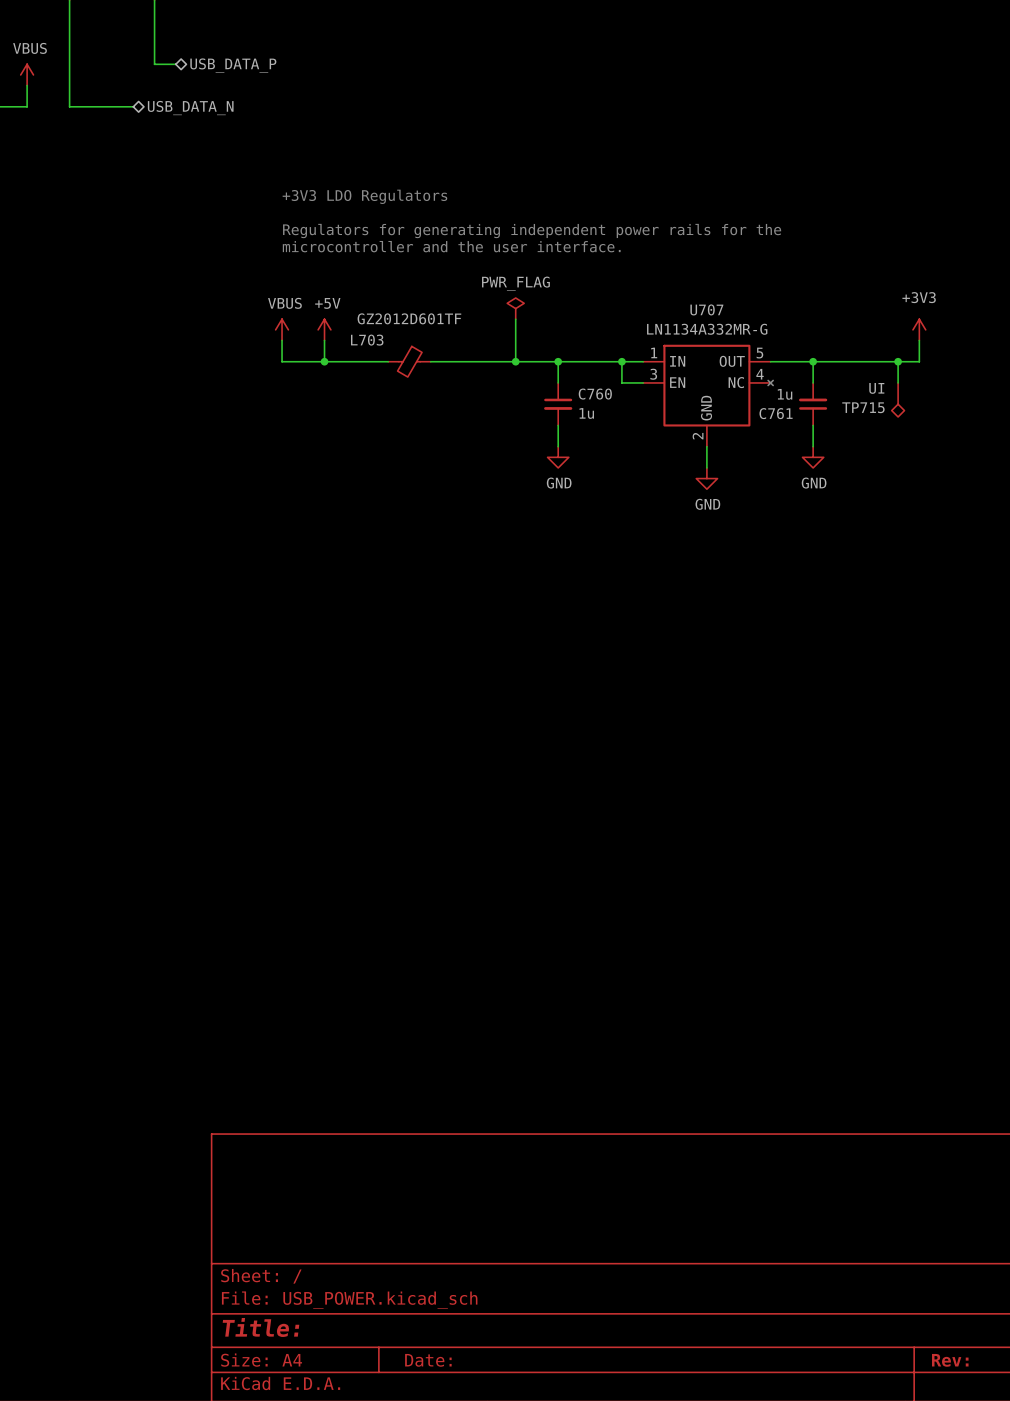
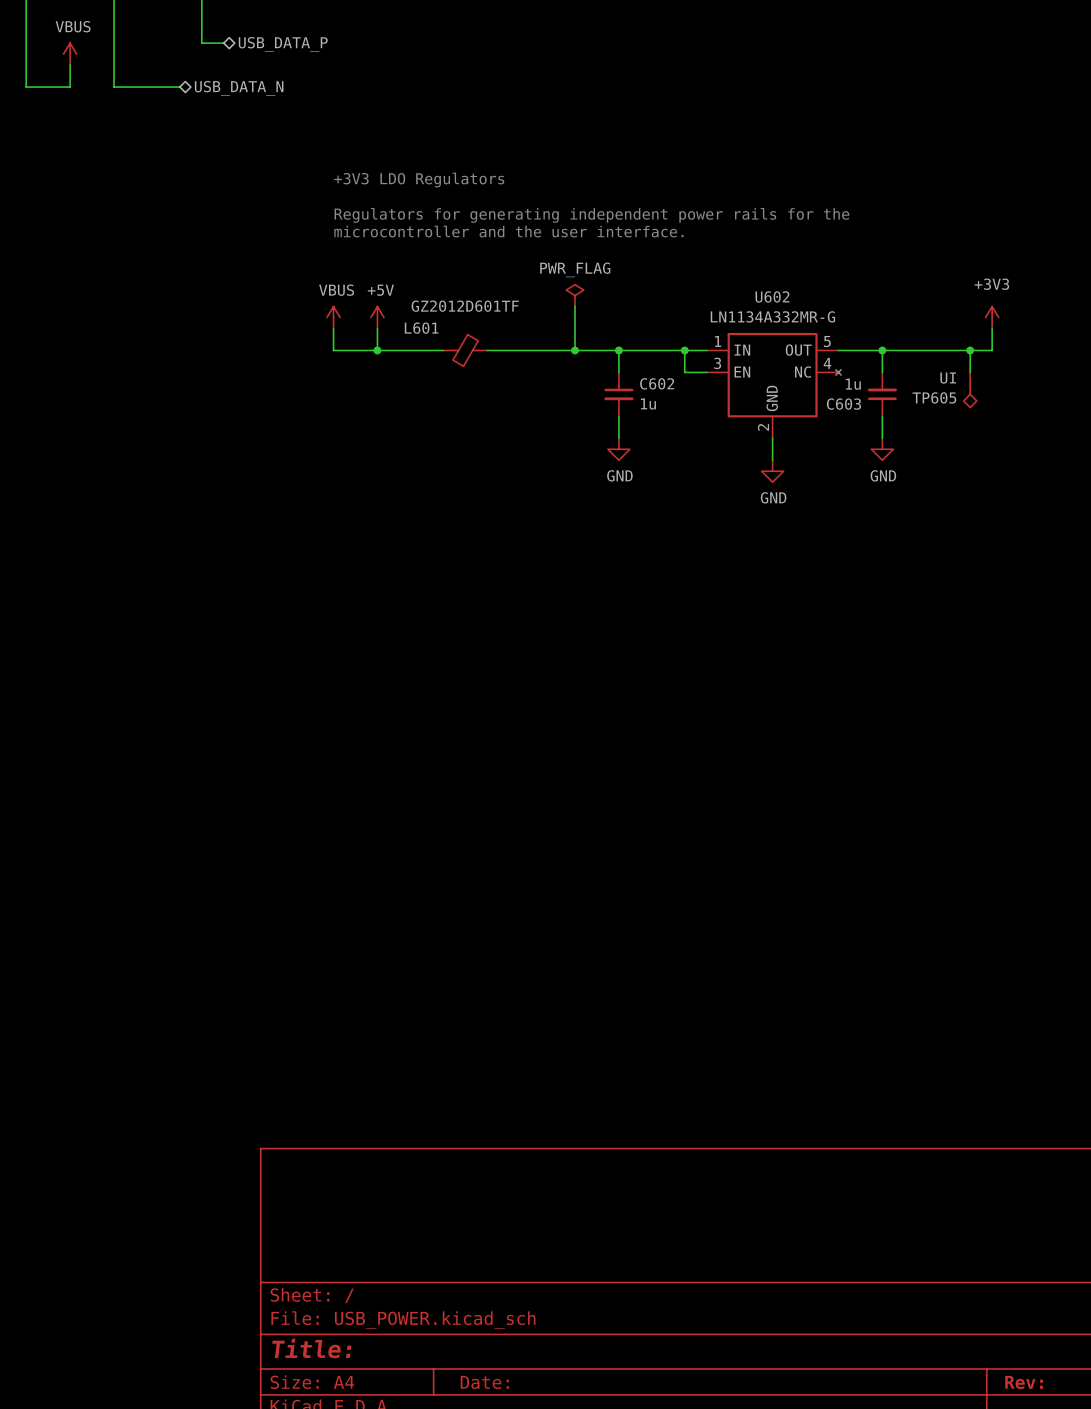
U707 name: U707 (706, 309) -> U602 (772, 296)
L703 name: L703 (367, 340) -> L601 (421, 328)
C760 name: C760 (595, 394) -> C602 (657, 383)
TP715 name: TP715 (863, 407) -> TP605 (934, 397)
C761 name: C761 (776, 413) -> C603 (843, 404)

